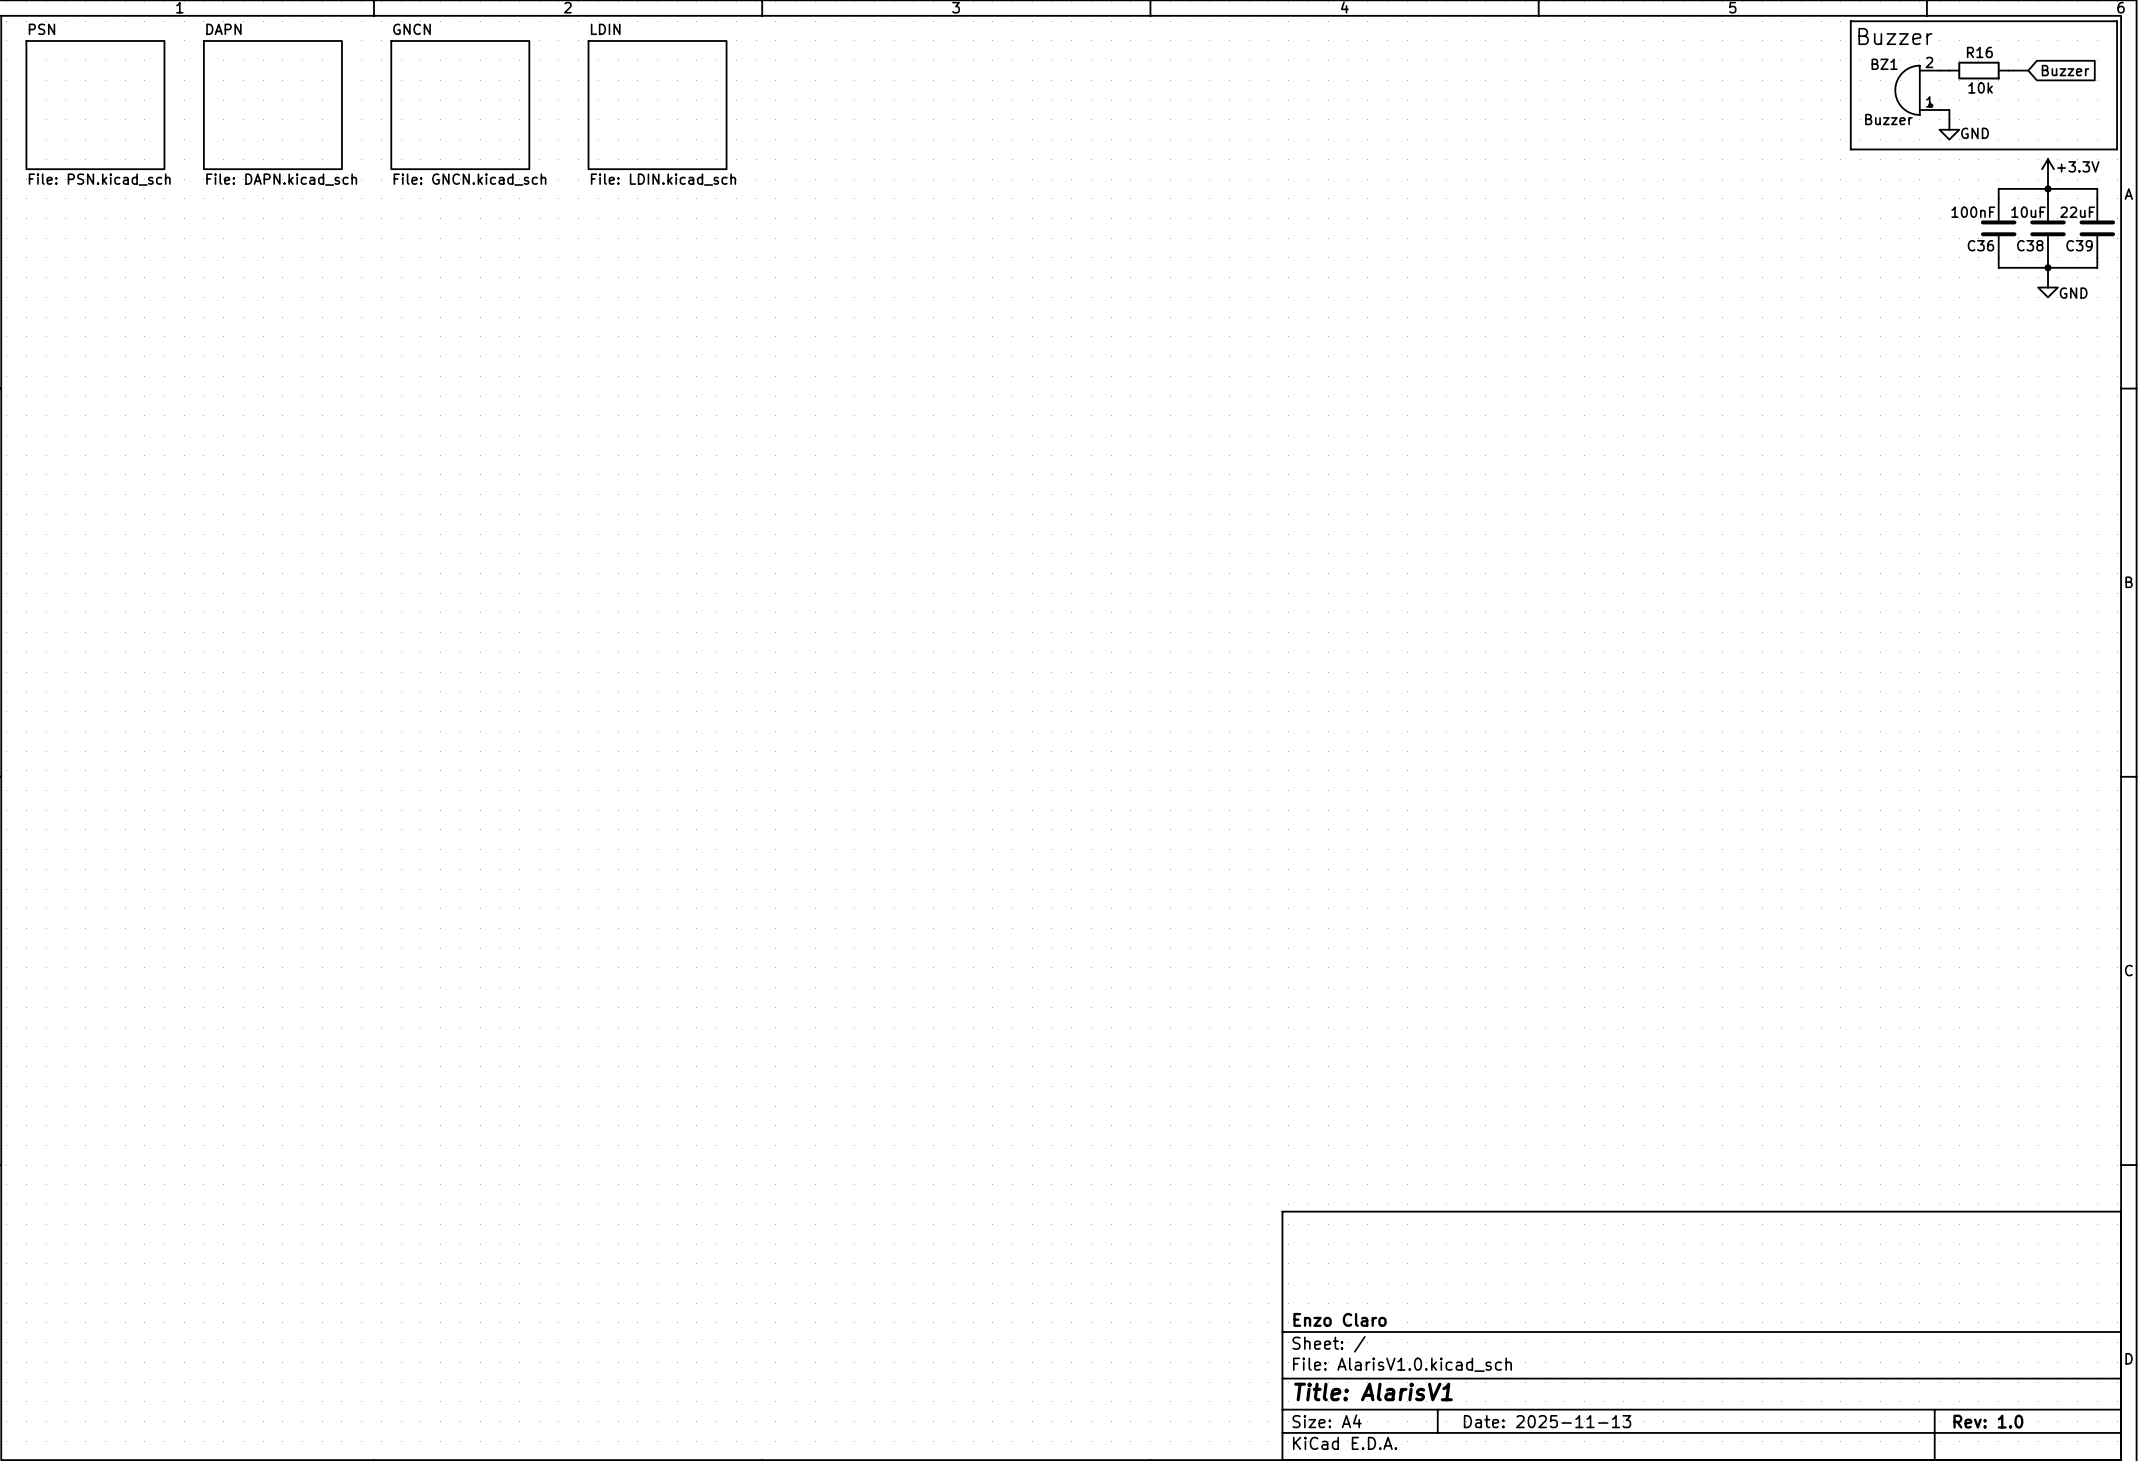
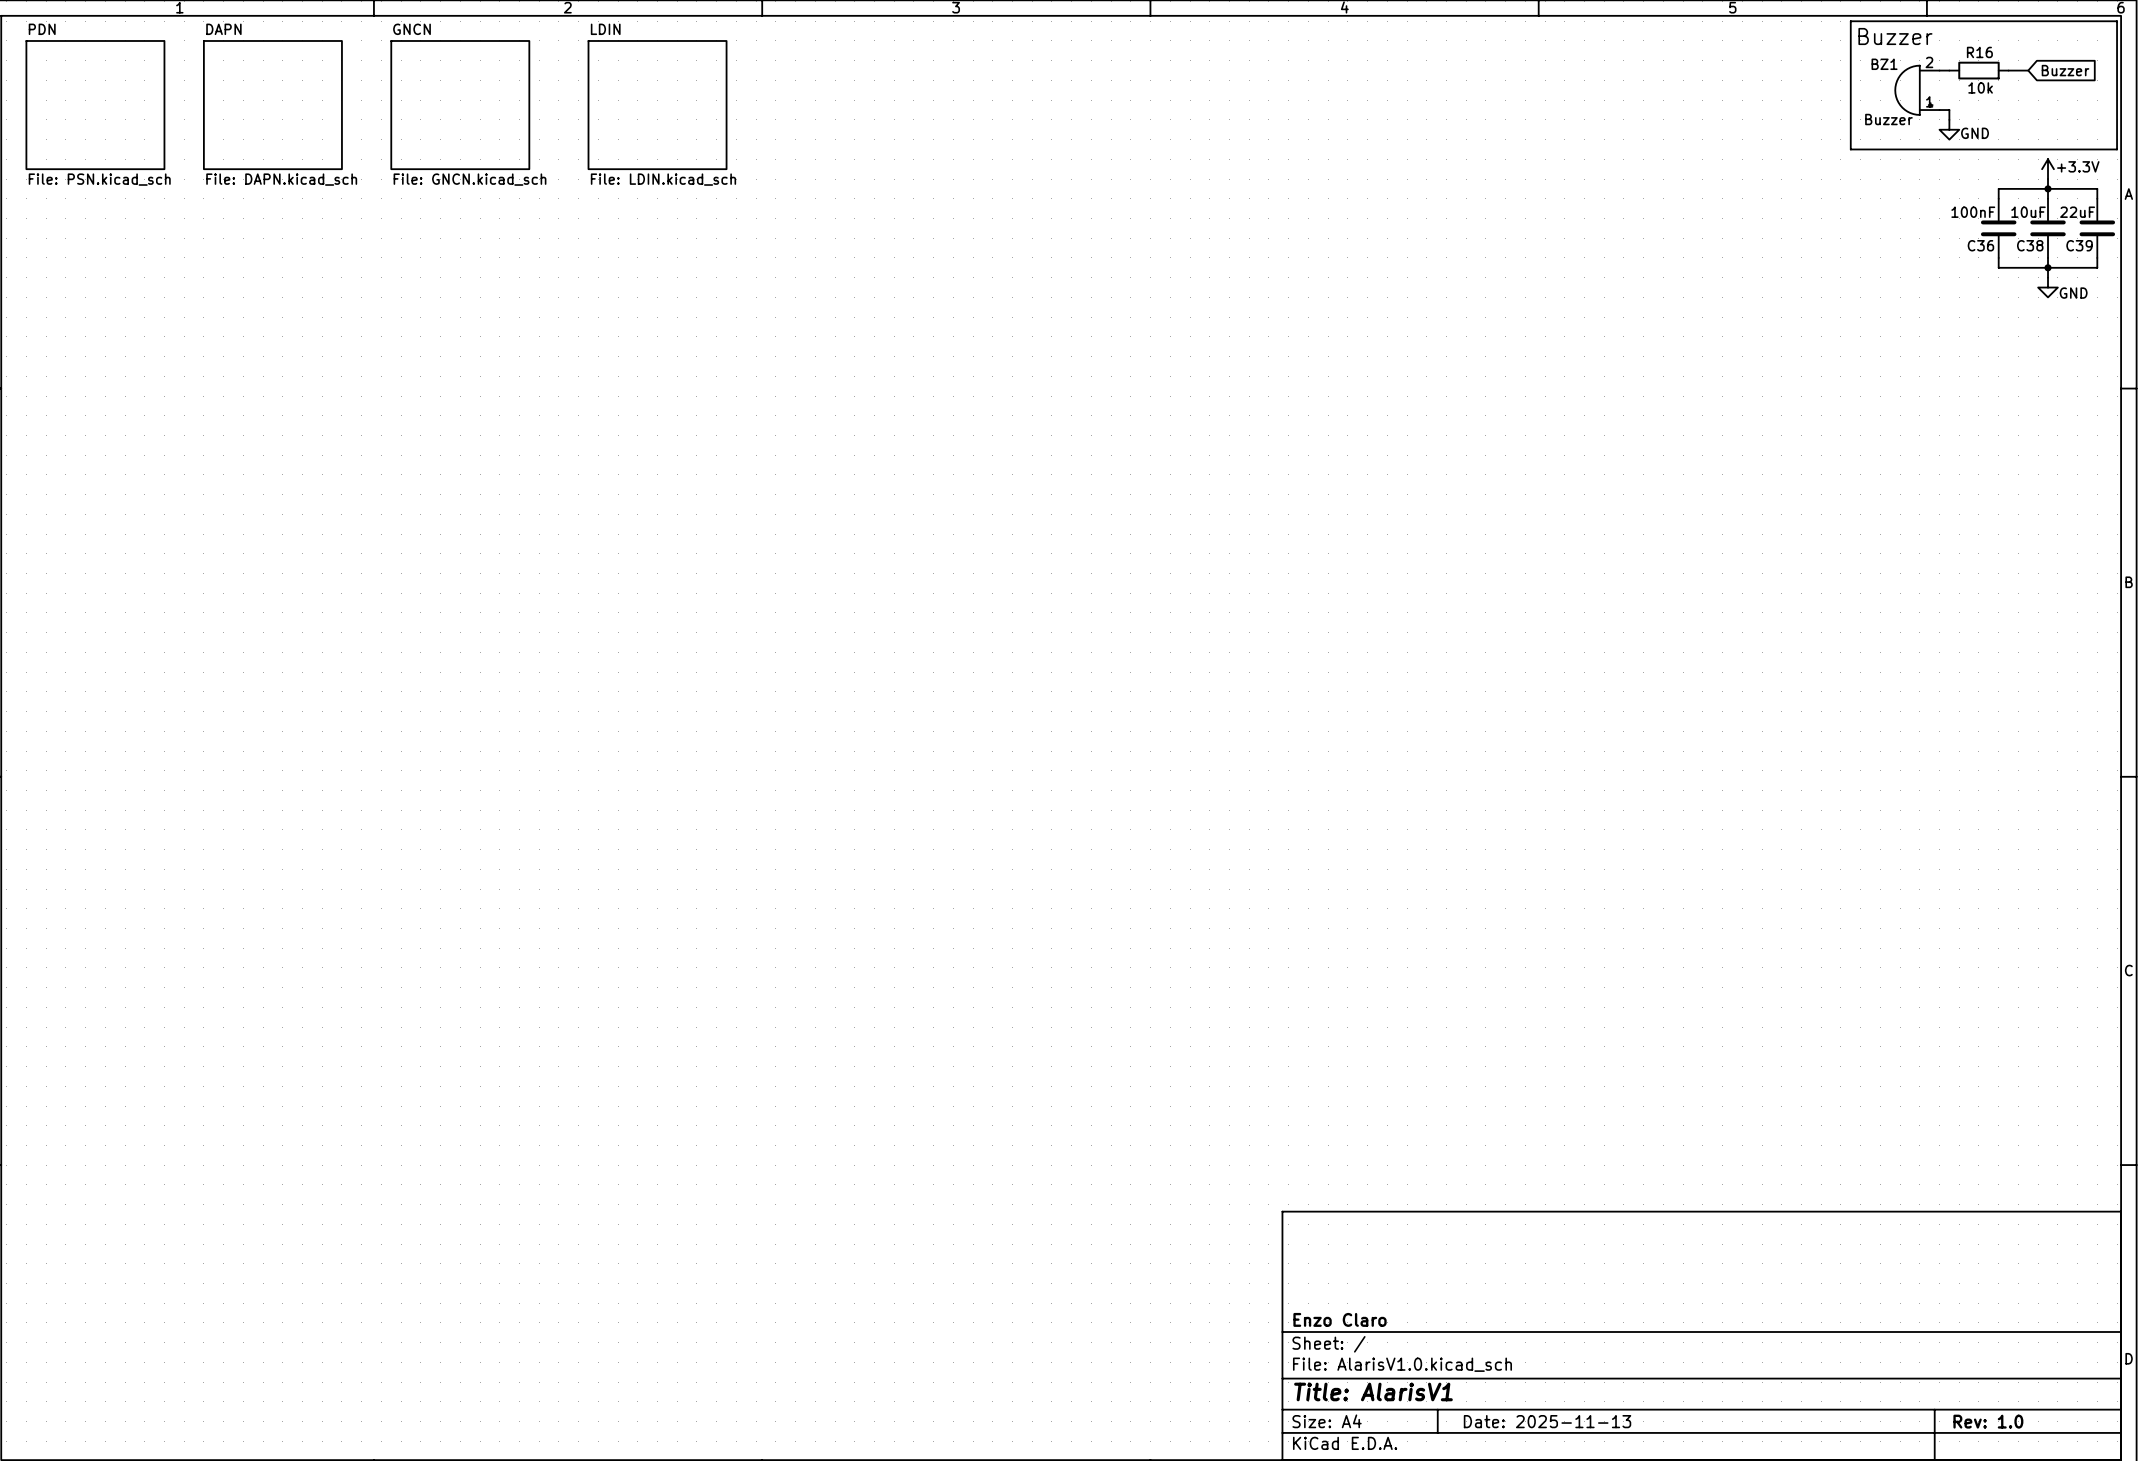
sheet PSN name: PSN (41, 29) -> PDN (42, 29)

